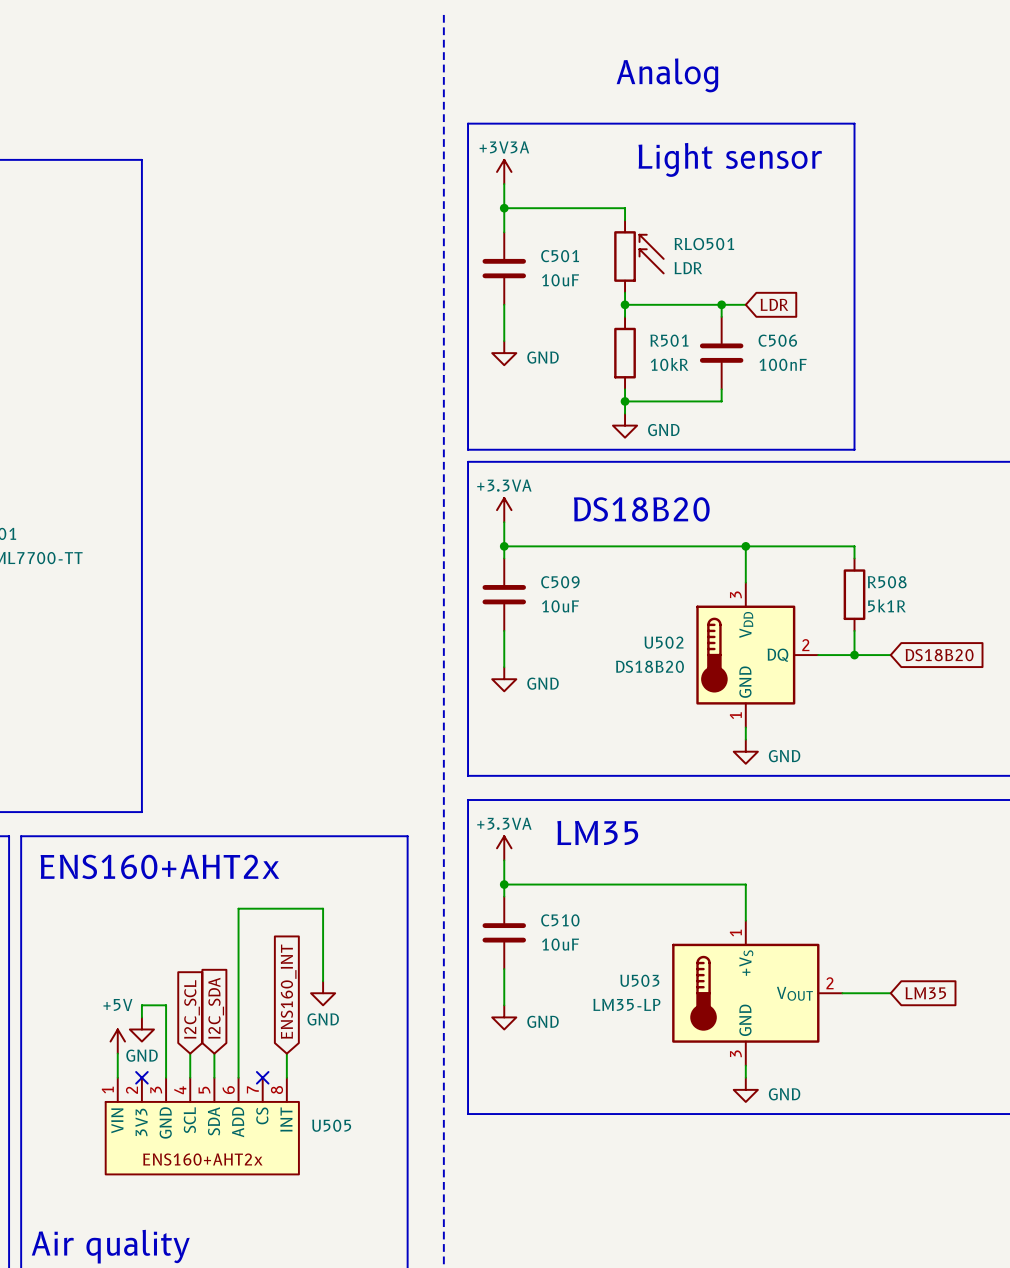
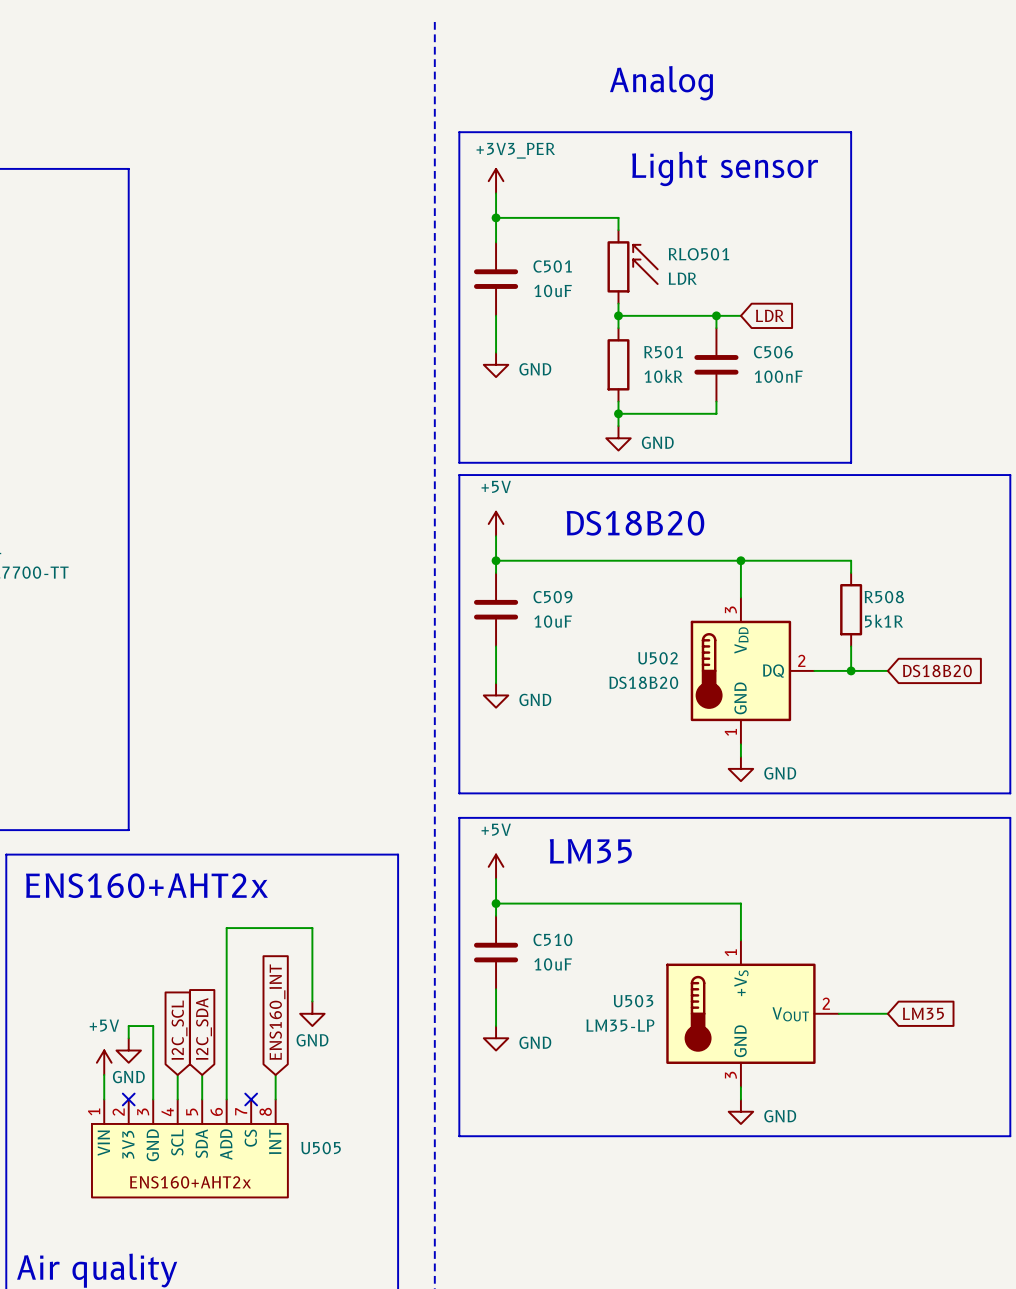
power symbol: +3V3A (504, 171) -> +3V3_PER (496, 181)
power symbol: +3.3VA (504, 510) -> +5V (496, 524)
power symbol: +3.3VA (504, 848) -> +5V (496, 866)

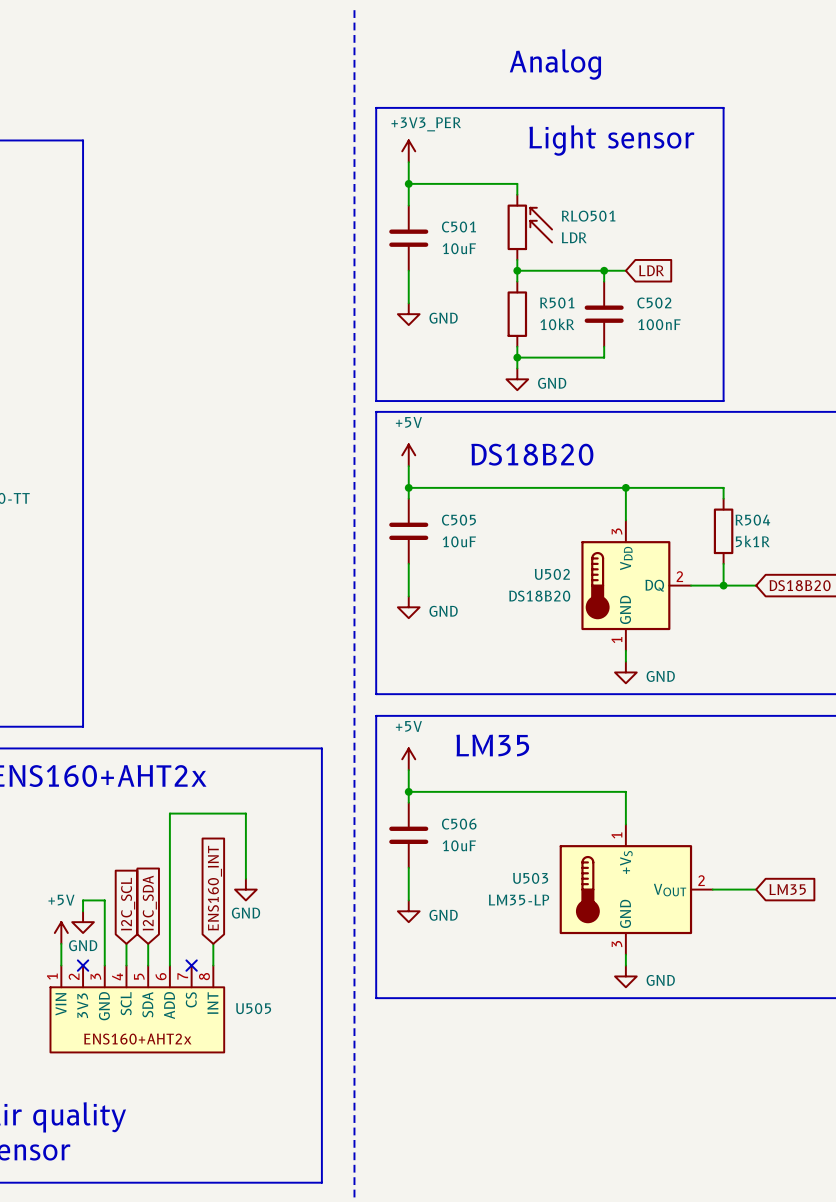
C506 name: C506 (773, 352) -> C502 (654, 302)
C509 name: C509 (552, 597) -> C505 (458, 520)
R508 name: R508 (884, 597) -> R504 (752, 520)
C510 name: C510 (552, 939) -> C506 (459, 824)

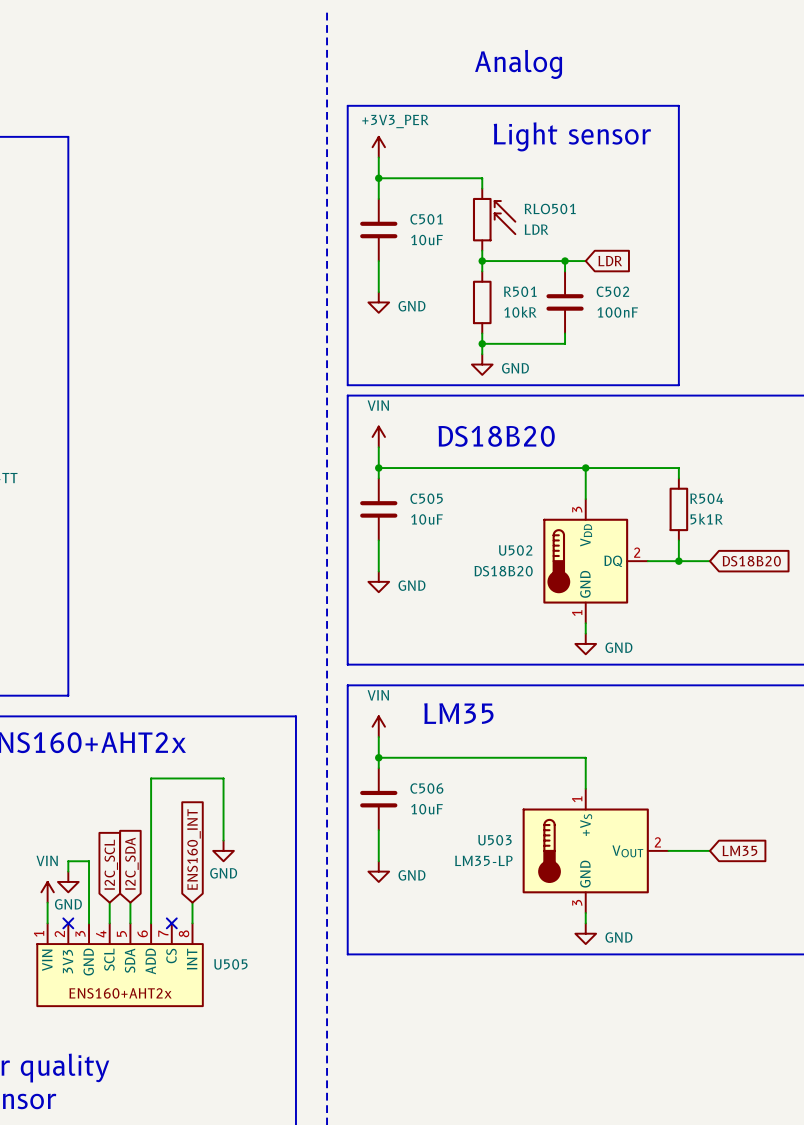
power symbol: +5V (408, 455) -> VIN (378, 436)
power symbol: +5V (408, 759) -> VIN (378, 726)
power symbol: +5V (61, 933) -> VIN (47, 892)

